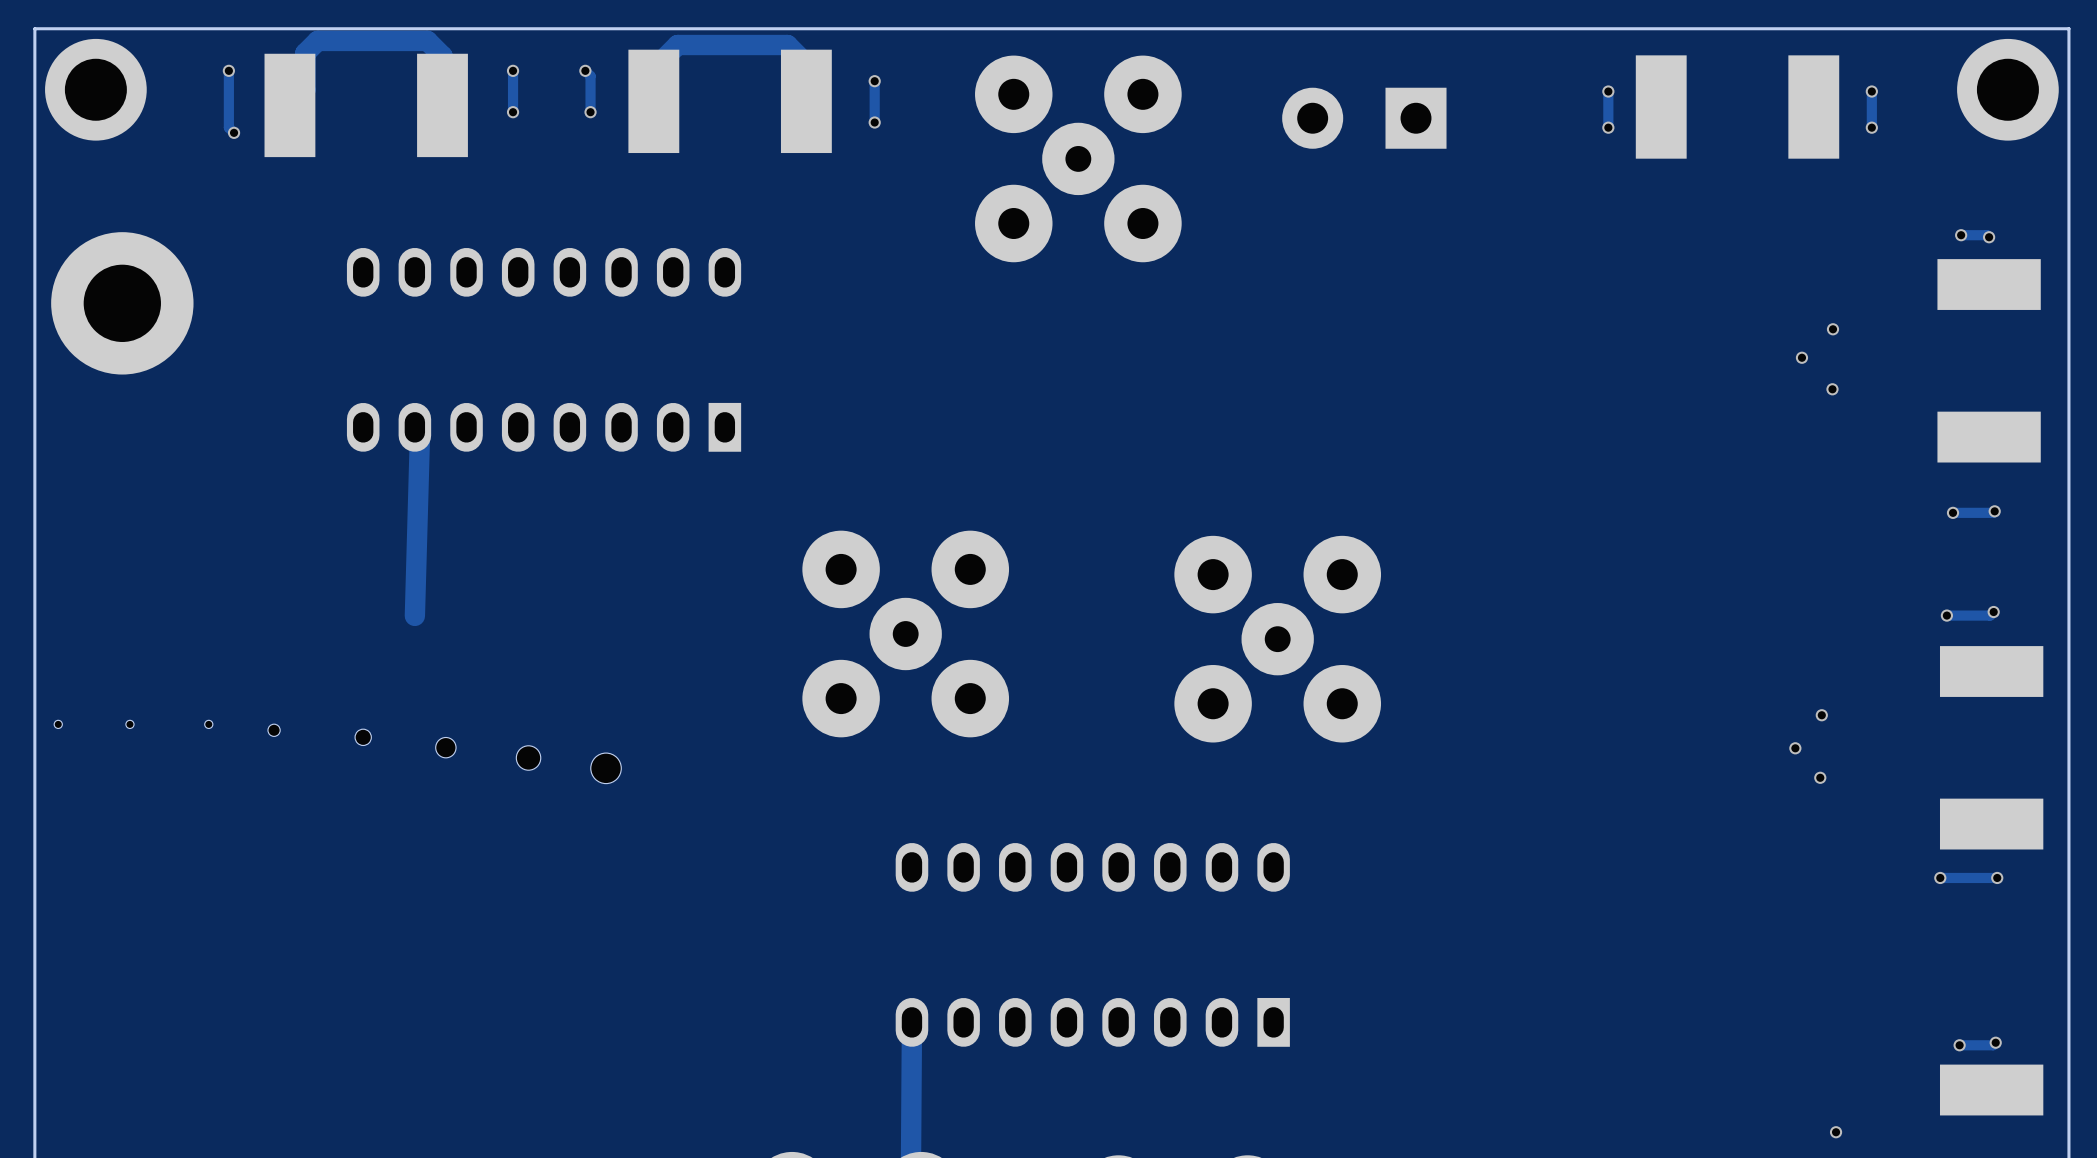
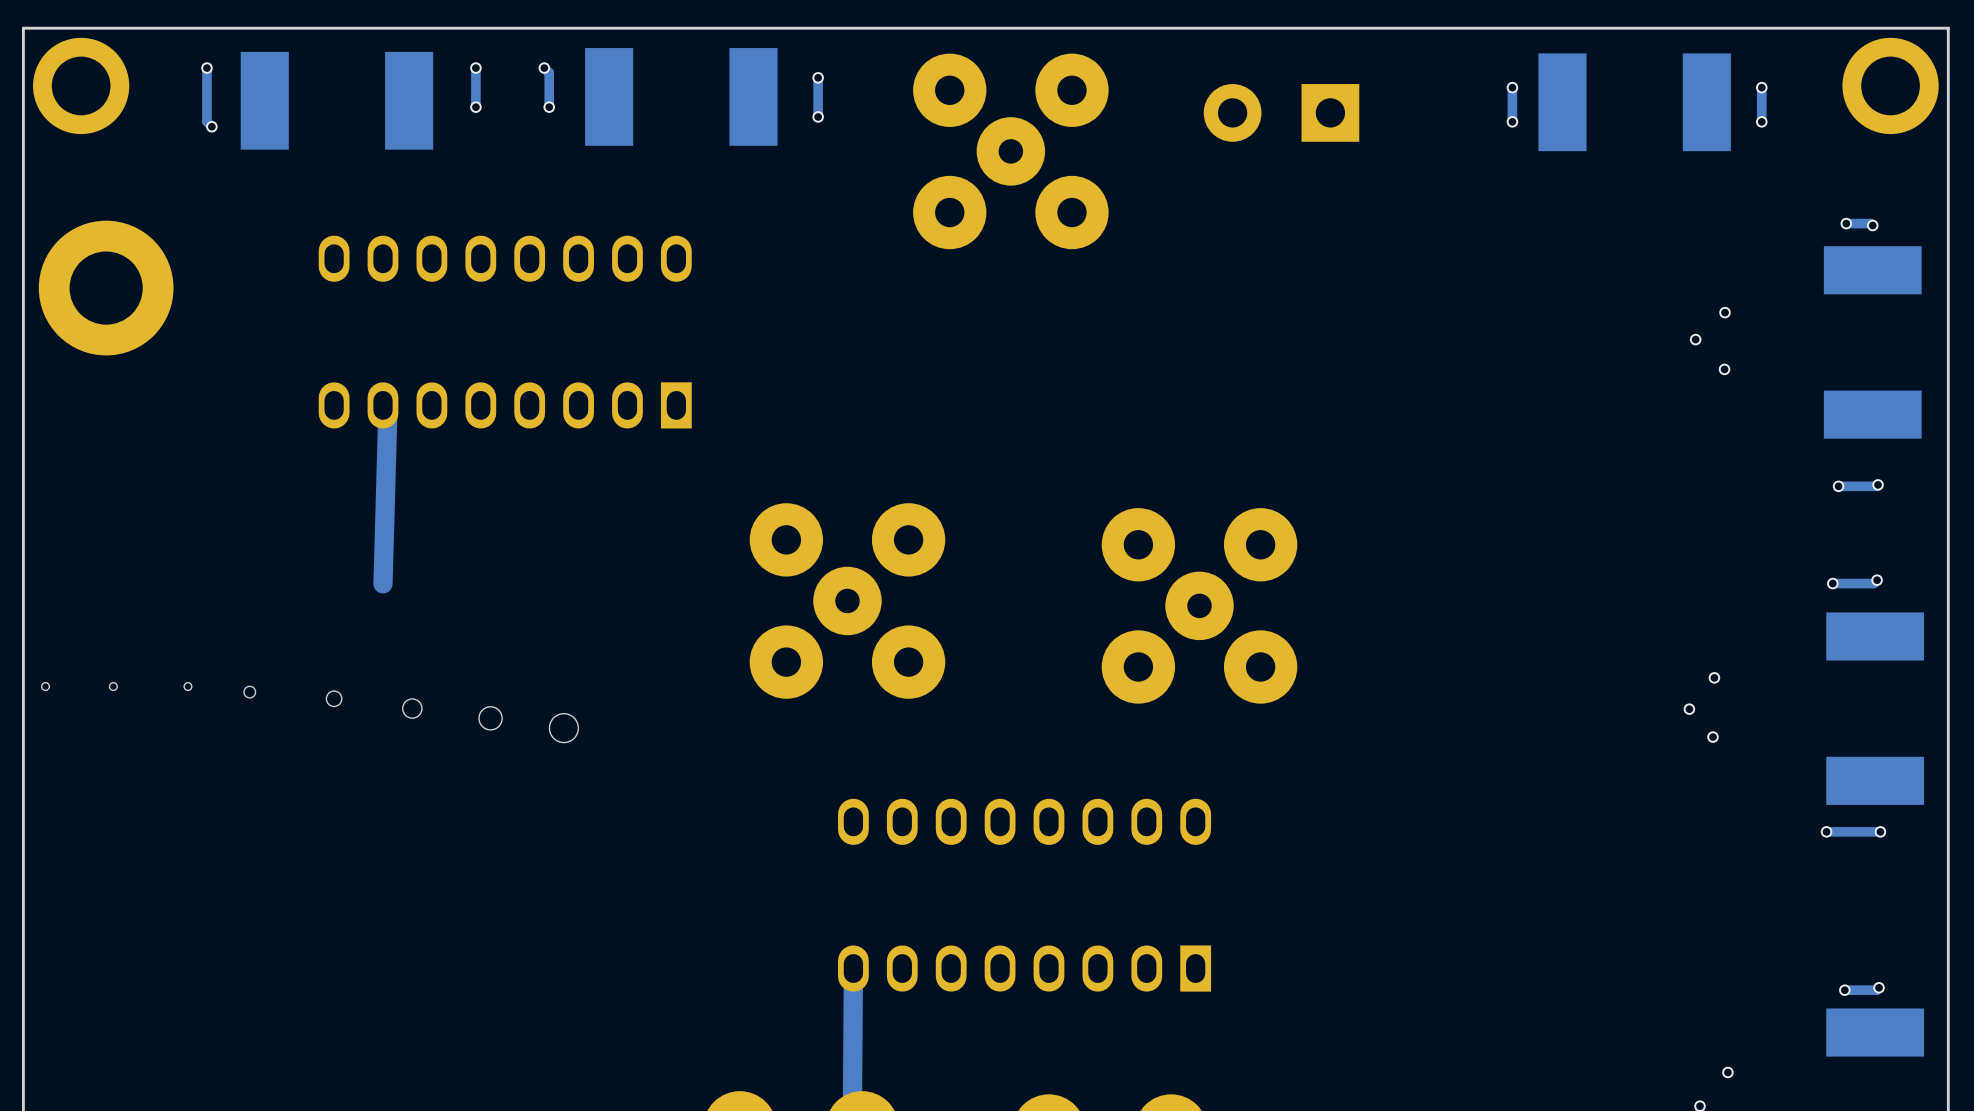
track: (806, 101) (806, 63) (787, 45) (677, 45) (653, 68) (653, 101) -> none
track: (442, 105) (442, 56) (427, 40) (317, 40) (305, 53) (305, 89) (289, 105) -> none

